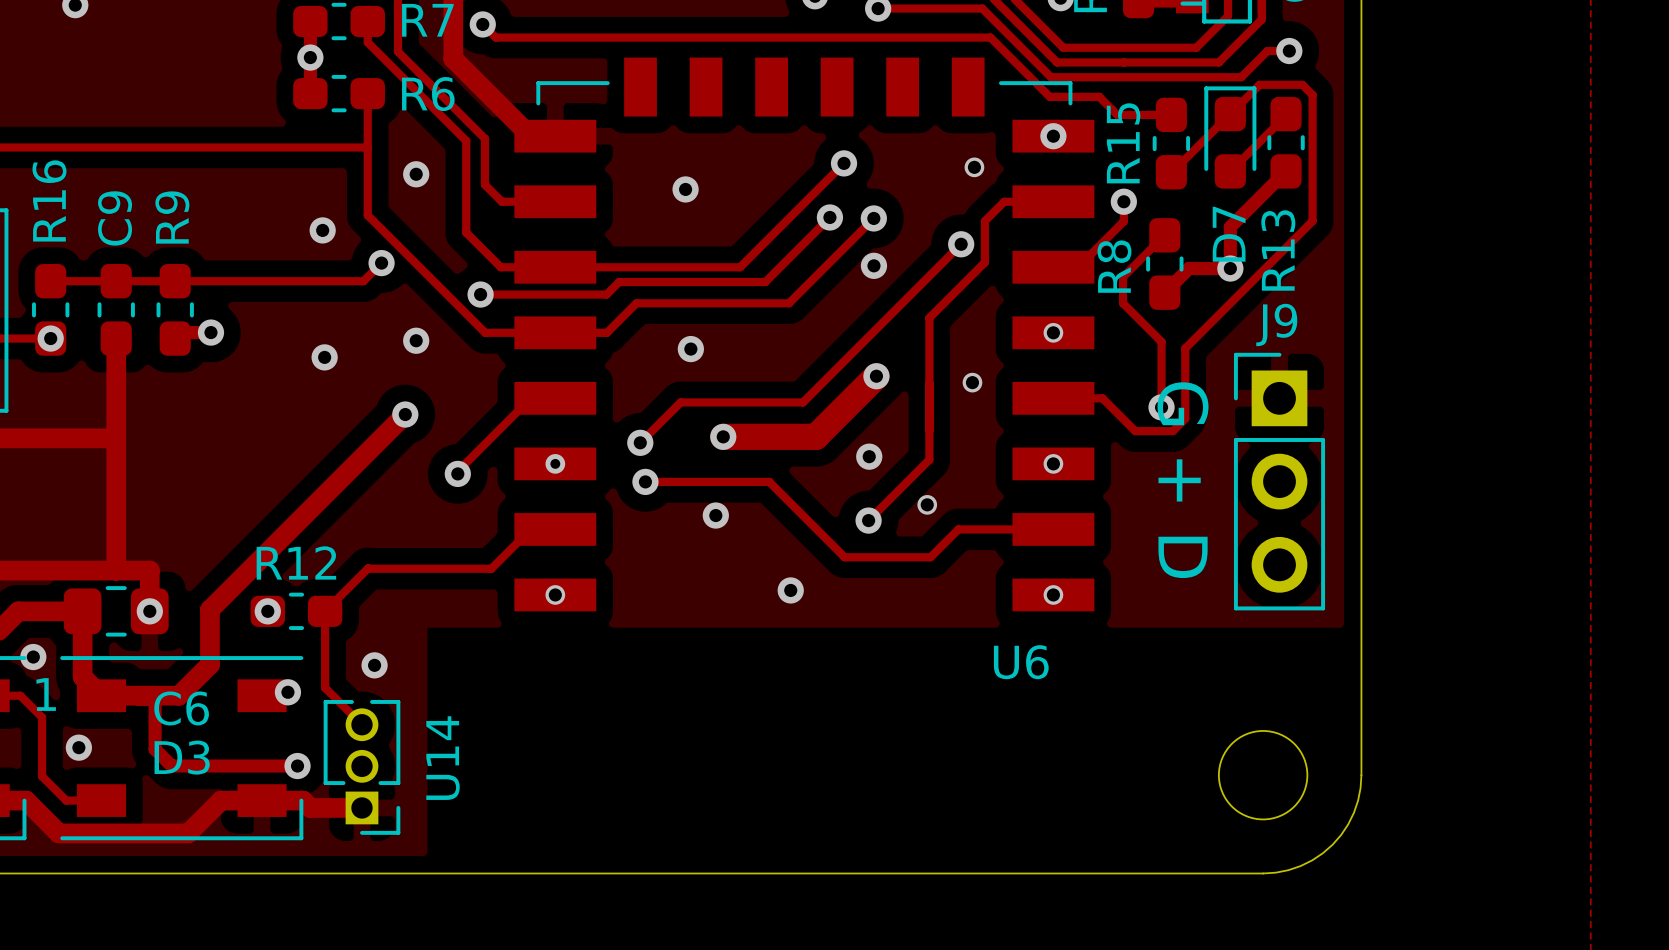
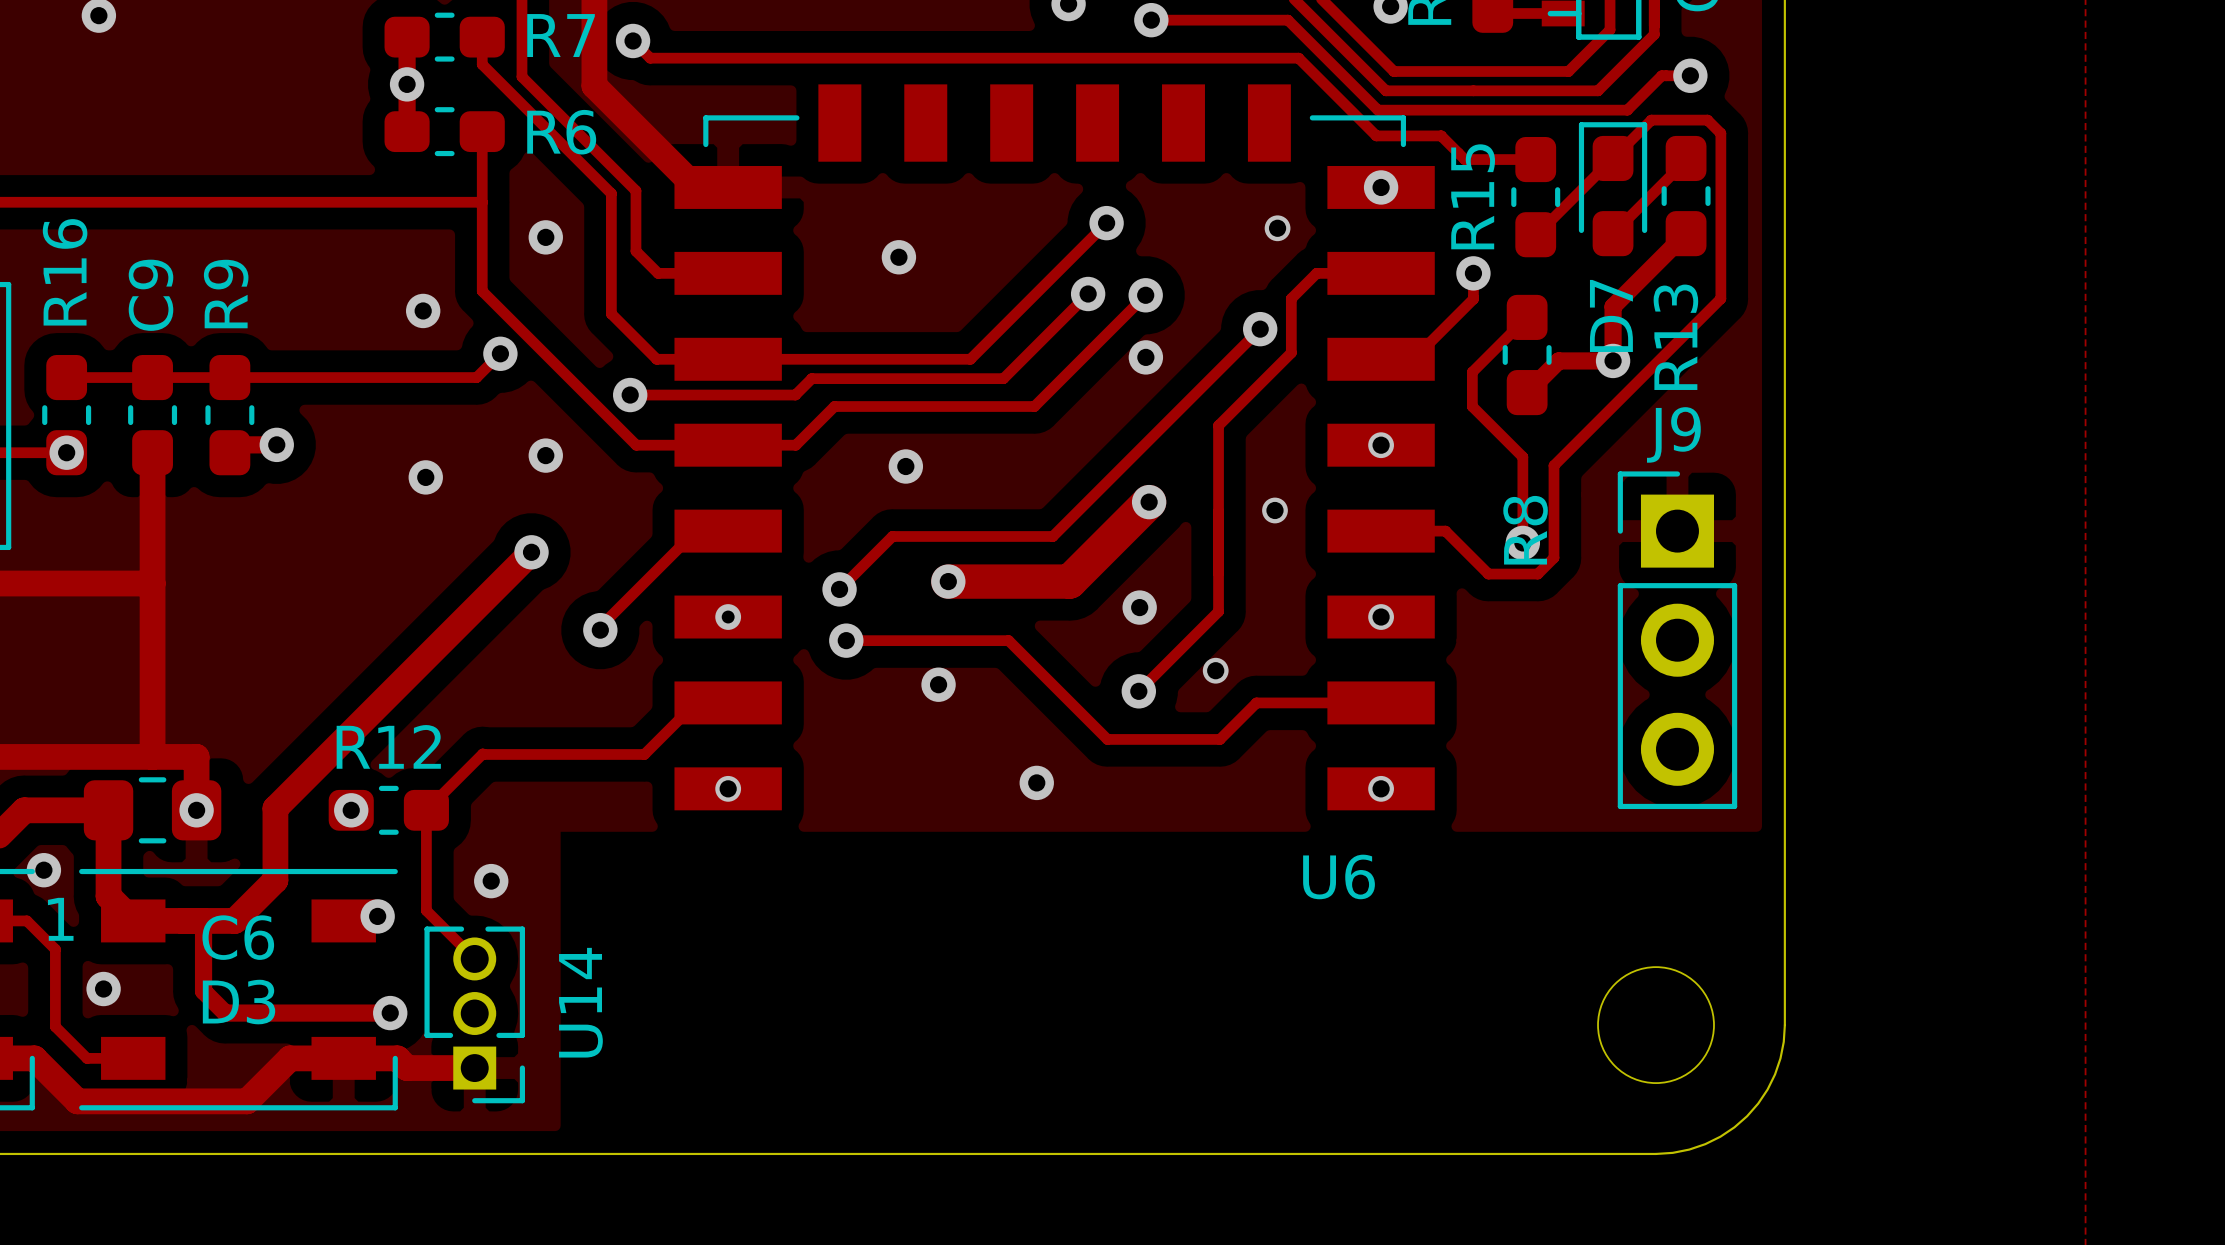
R8 name position: R8 (1114, 266) -> R8 (1525, 530)
text: G + D (1183, 480) -> none

